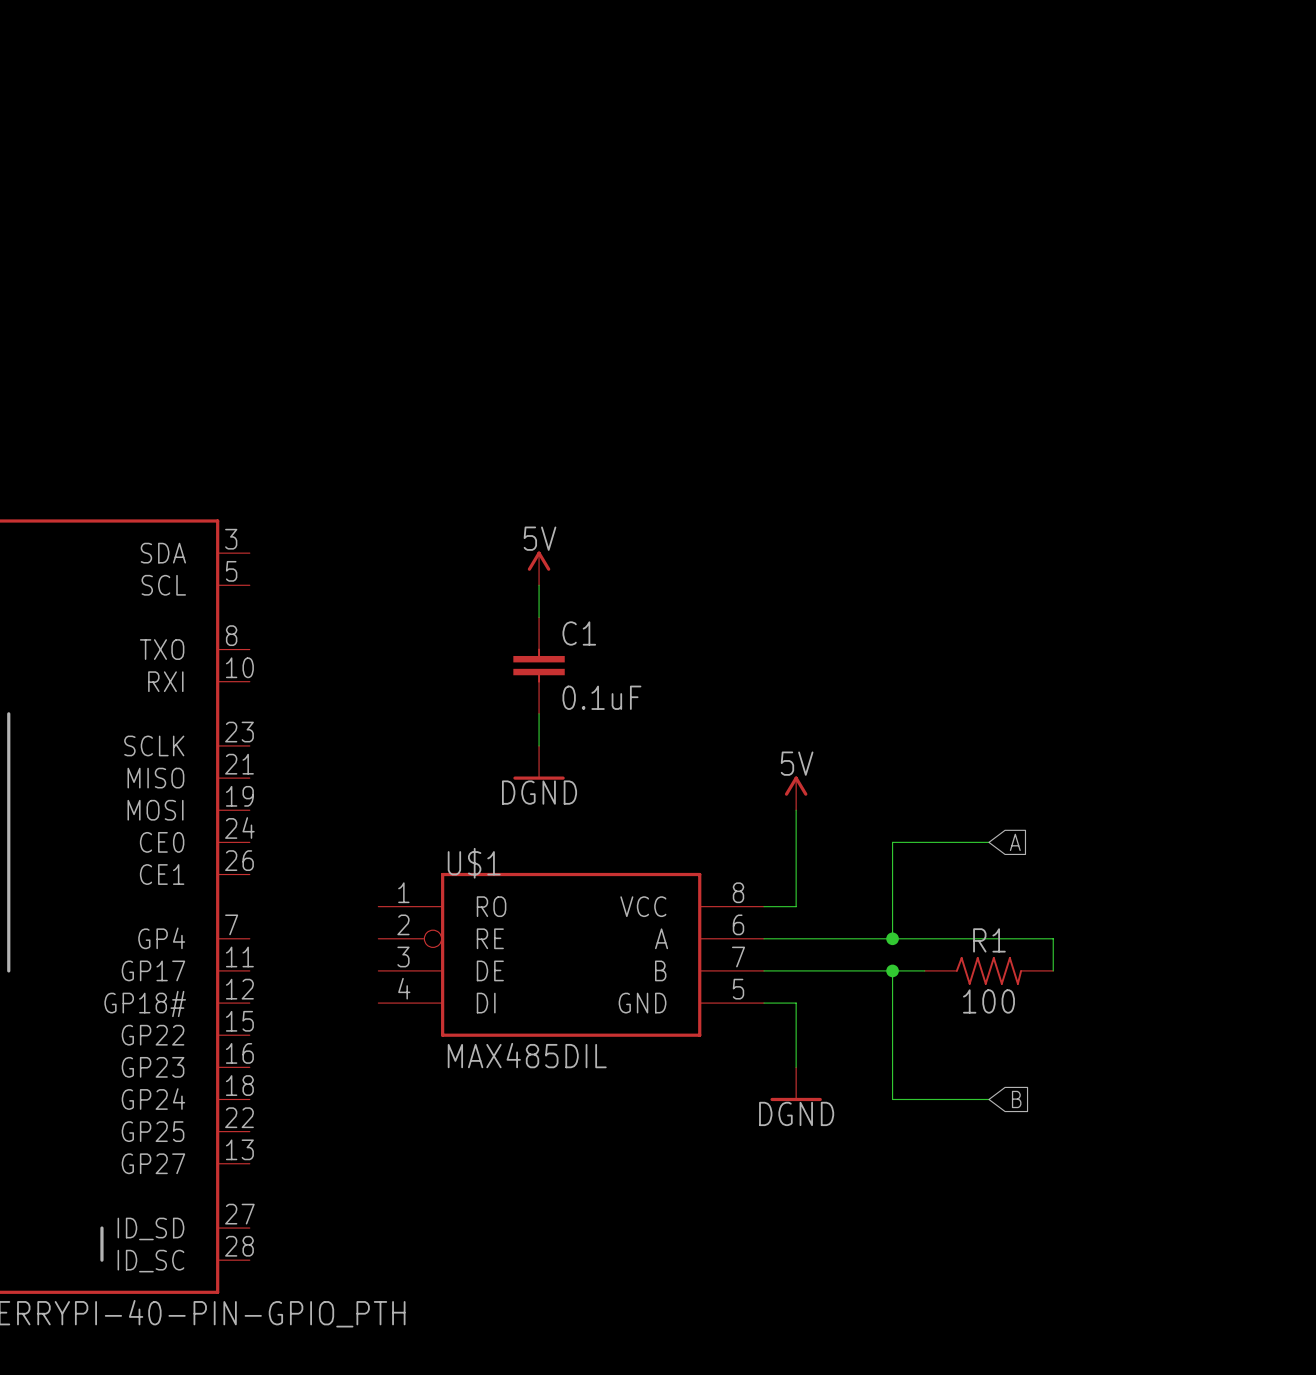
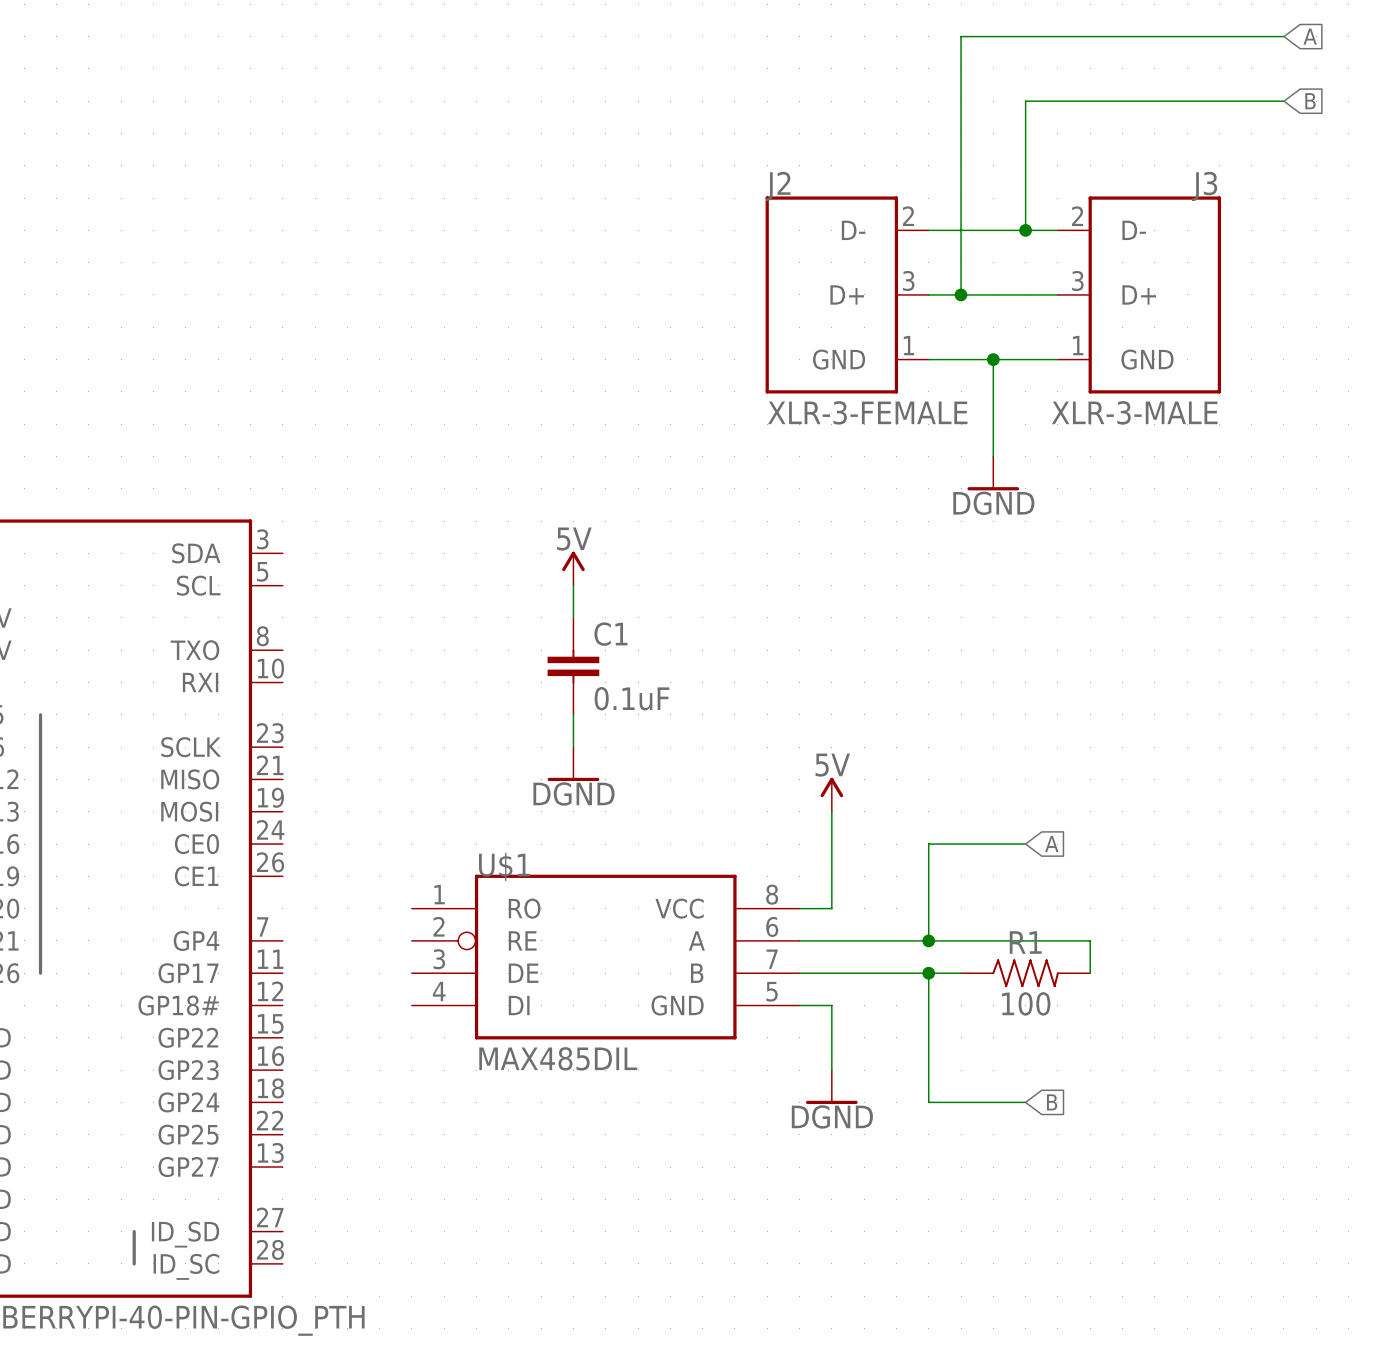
wire: none -> (1283, 36) (961, 36) (961, 294)
global label: none -> A (1310, 36)
wire: none -> (1283, 101) (1025, 101) (1025, 230)
global label: none -> B (1310, 101)
wire: none -> (928, 230) (1057, 230)
junction: none -> (1025, 230)
J2: none -> XLR-3-FEMALE (847, 294)
wire: none -> (928, 294) (1057, 294)
junction: none -> (961, 294)
J3: none -> XLR-3-MALE (1139, 294)
wire: none -> (928, 359) (1057, 359)
wire: none -> (993, 359) (993, 456)
junction: none -> (993, 359)
power symbol: none -> DGND (993, 473)

